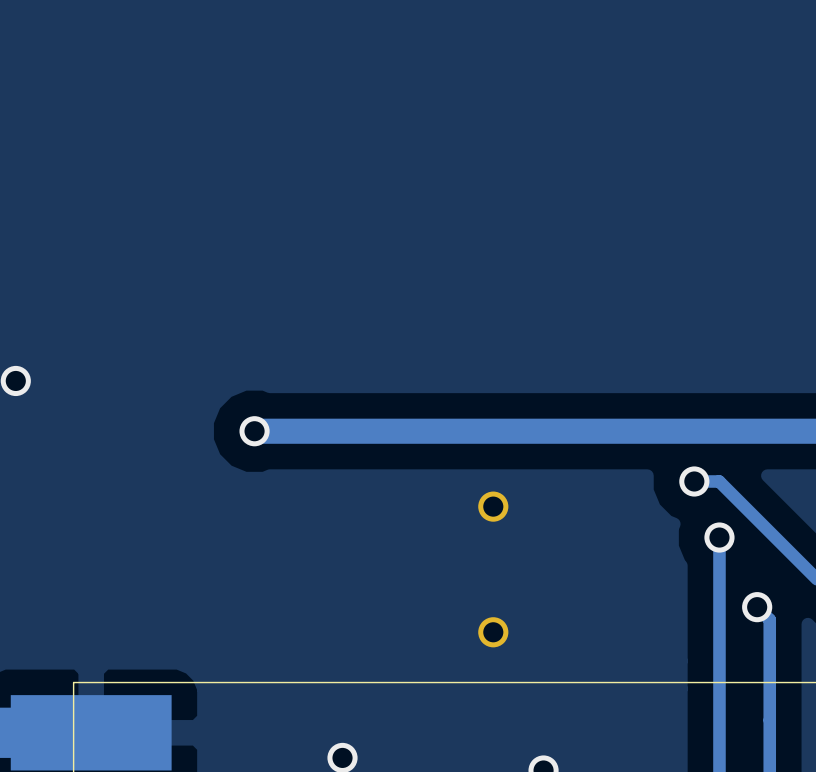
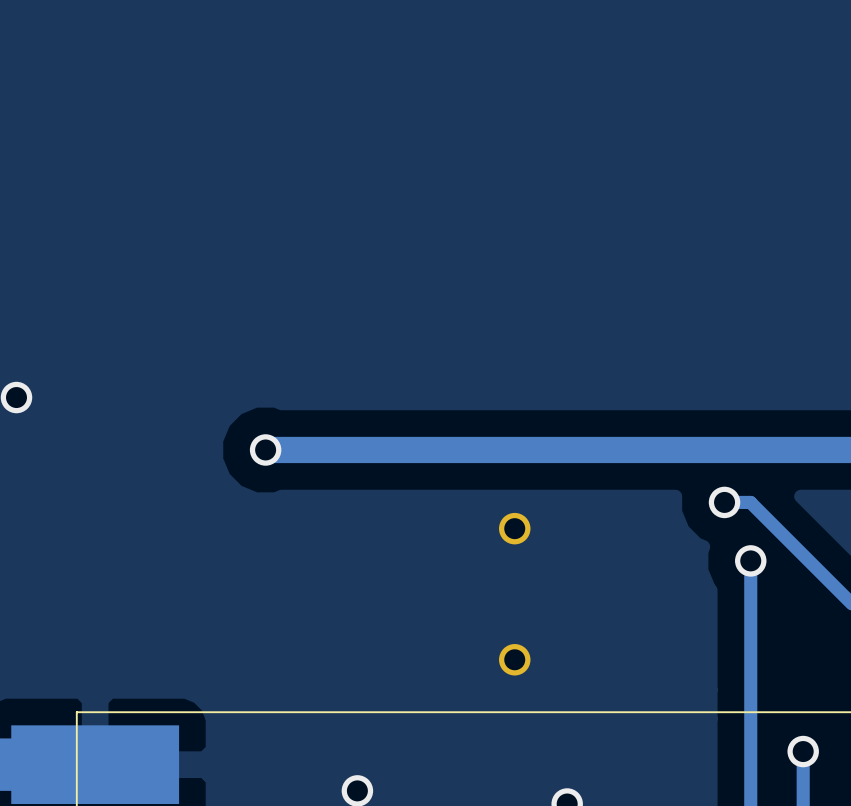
track: (757, 607) (769, 619) (769, 720) -> none
via position: (757, 607) -> (803, 751)

